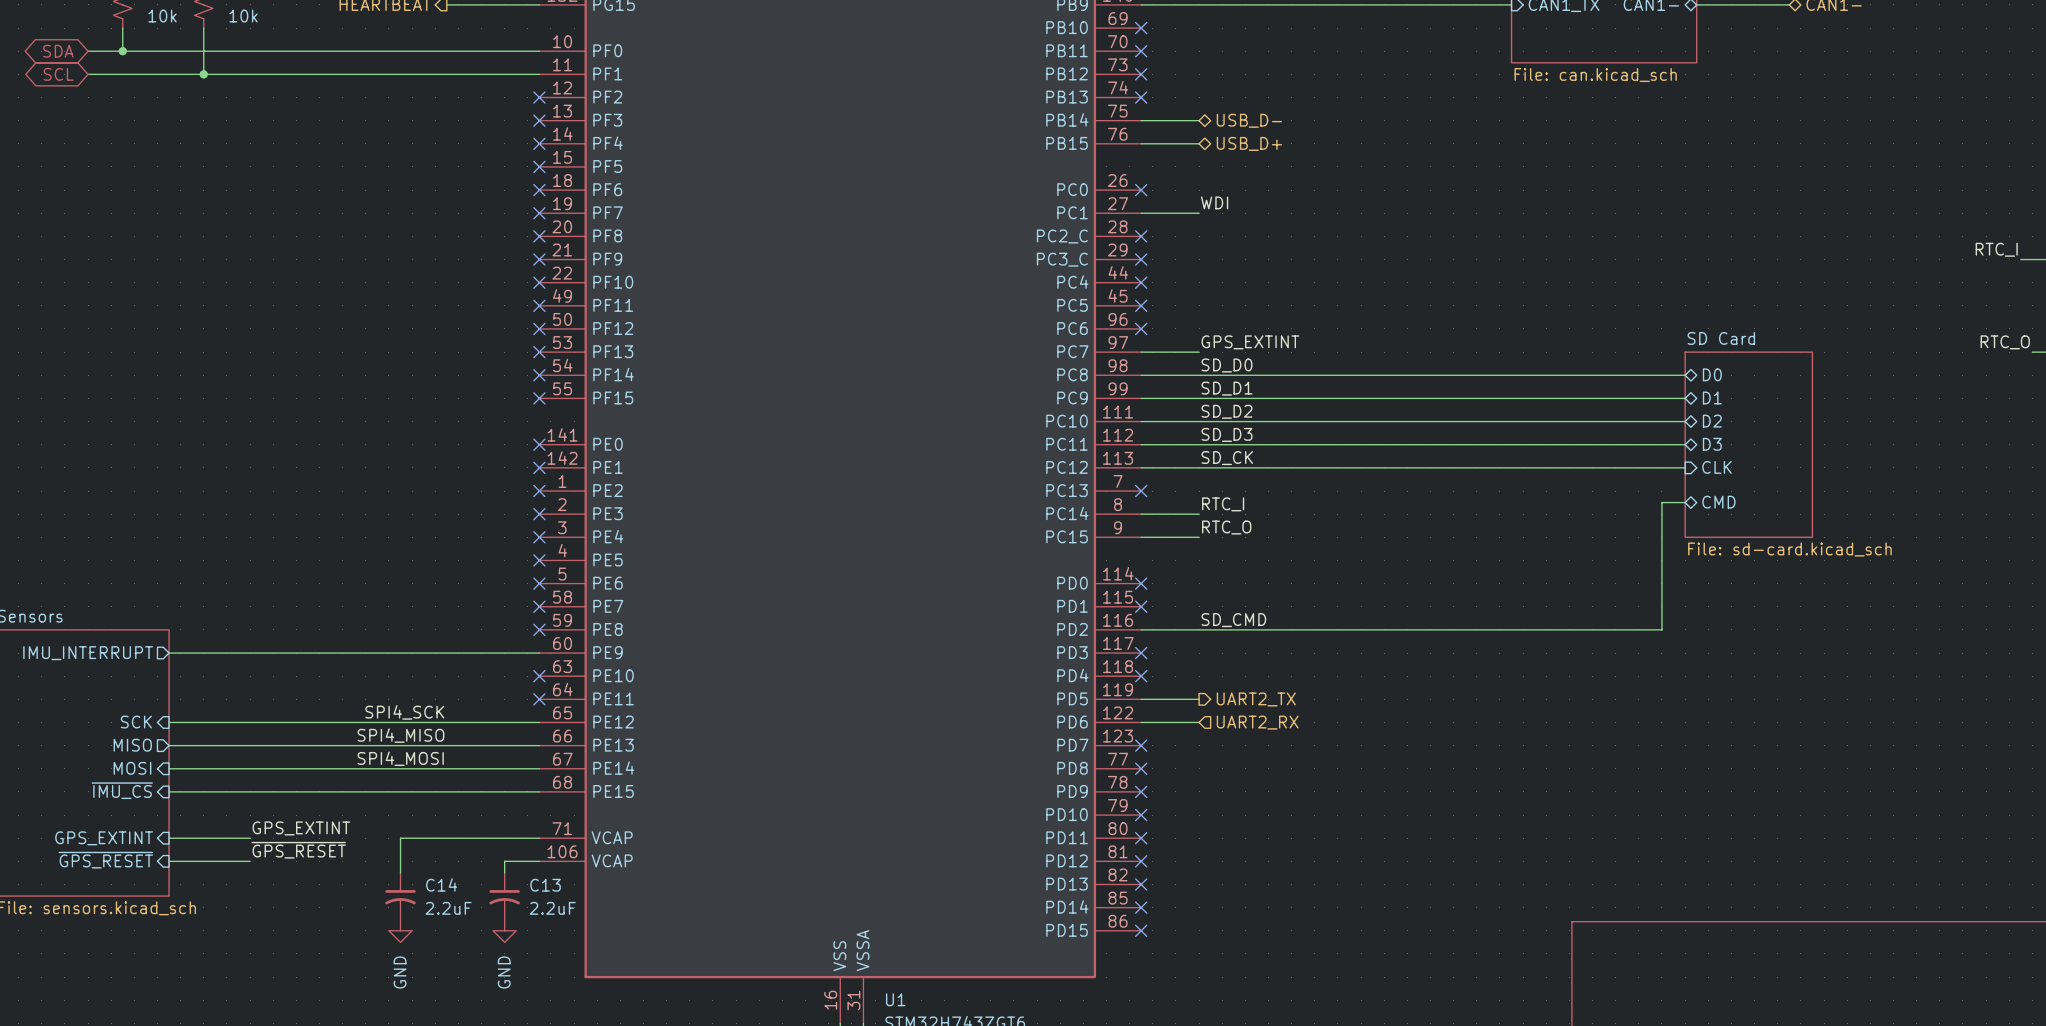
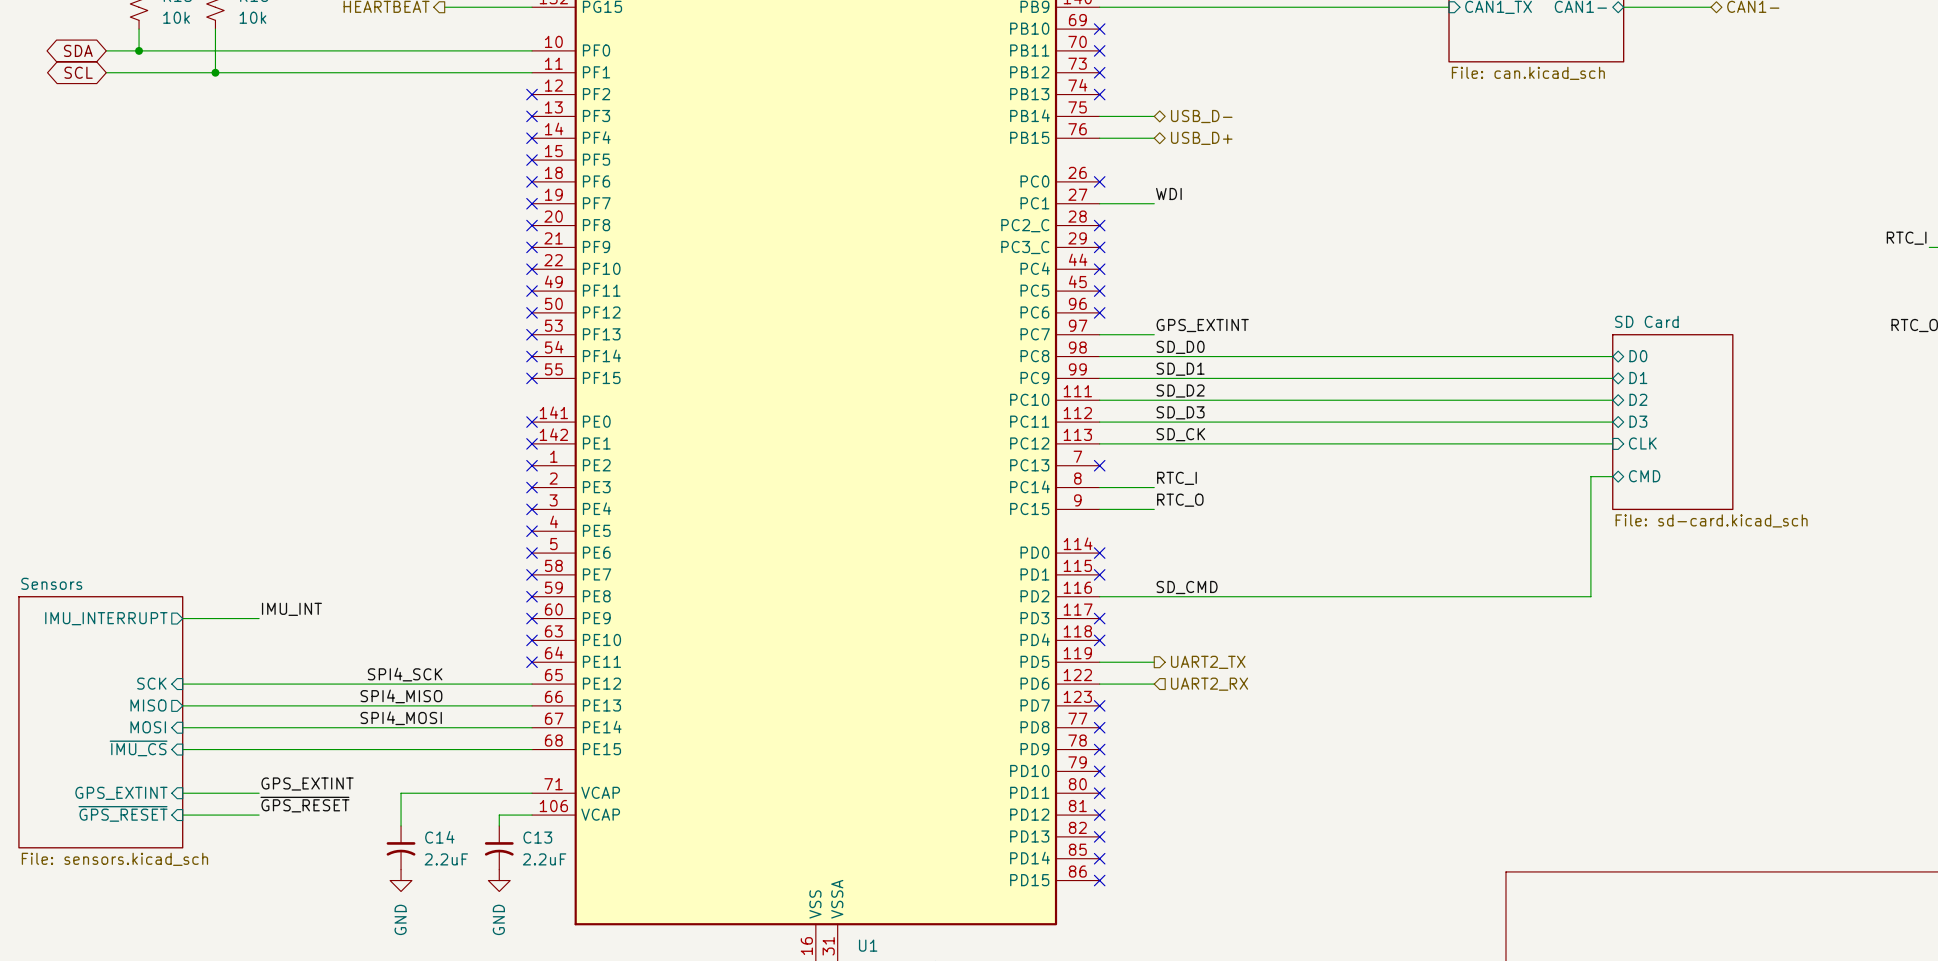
label: none -> IMU_INT (291, 609)
wire: (250, 653) (539, 653) -> none
no-connect mark: none -> (532, 618)

